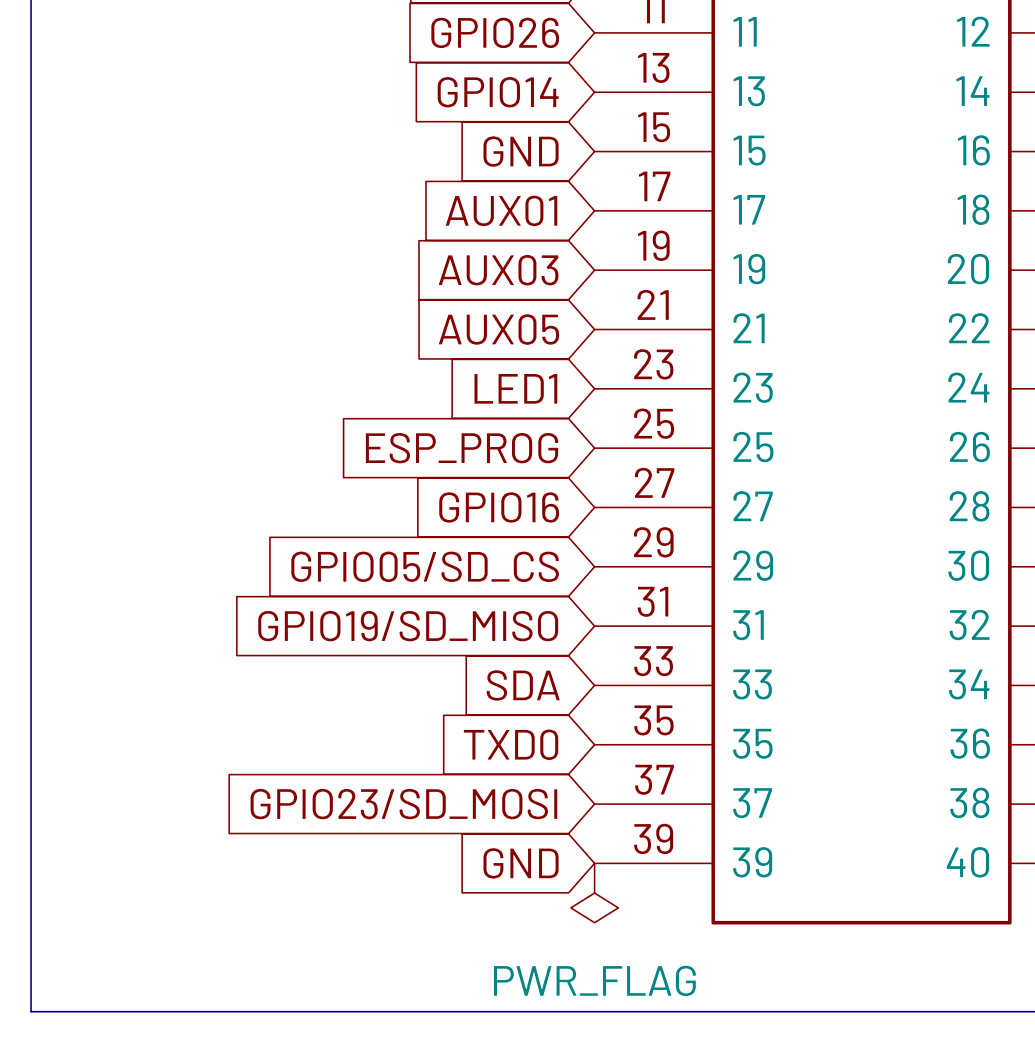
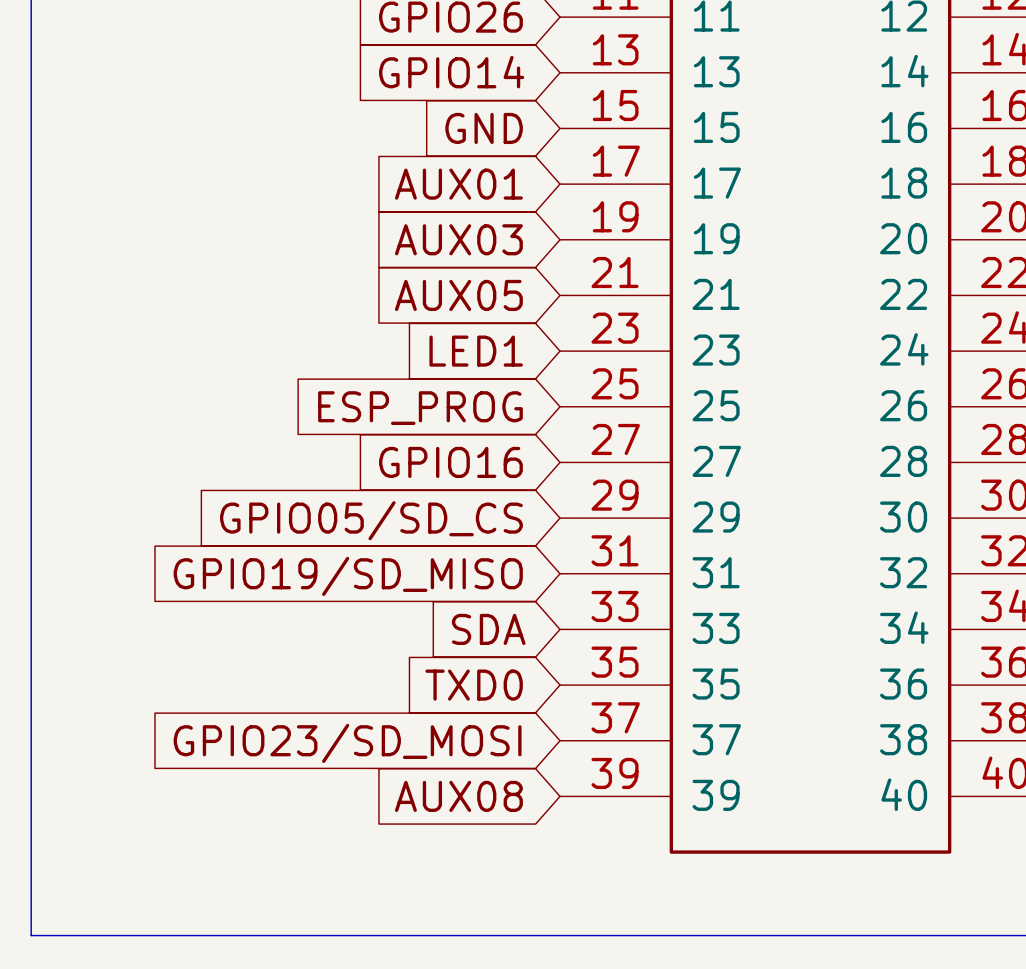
global label: GND (521, 863) -> AUX08 (458, 796)
power symbol: PWR_FLAG (594, 893) -> none

